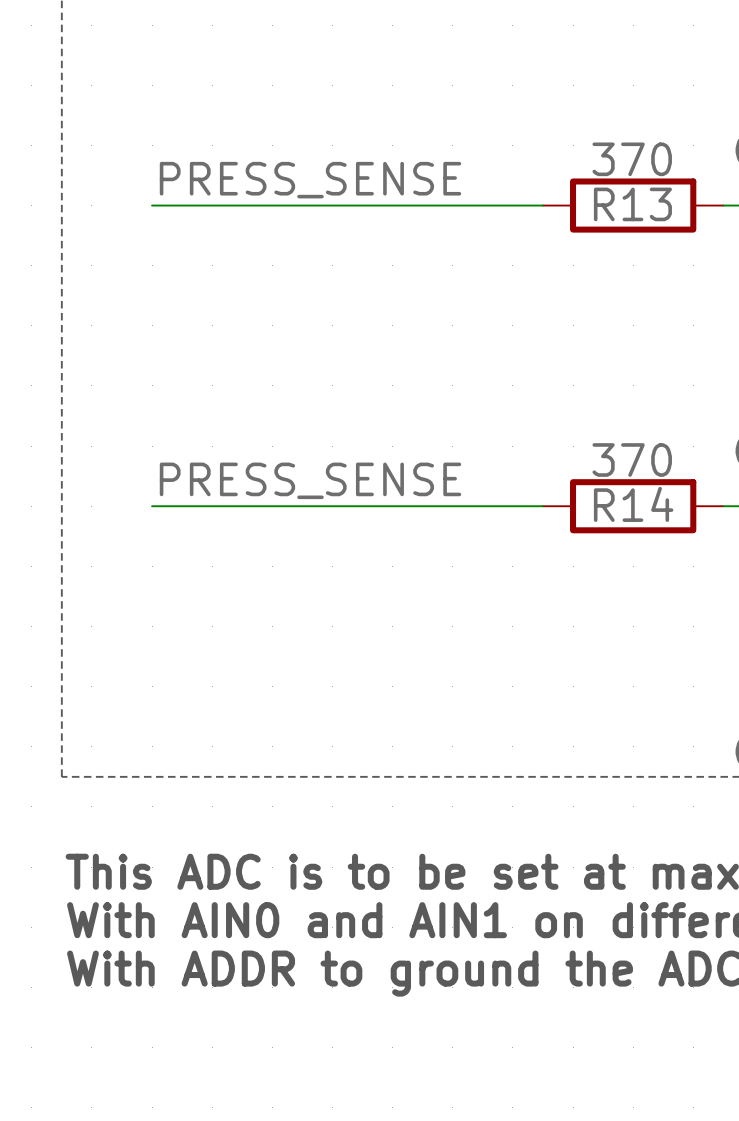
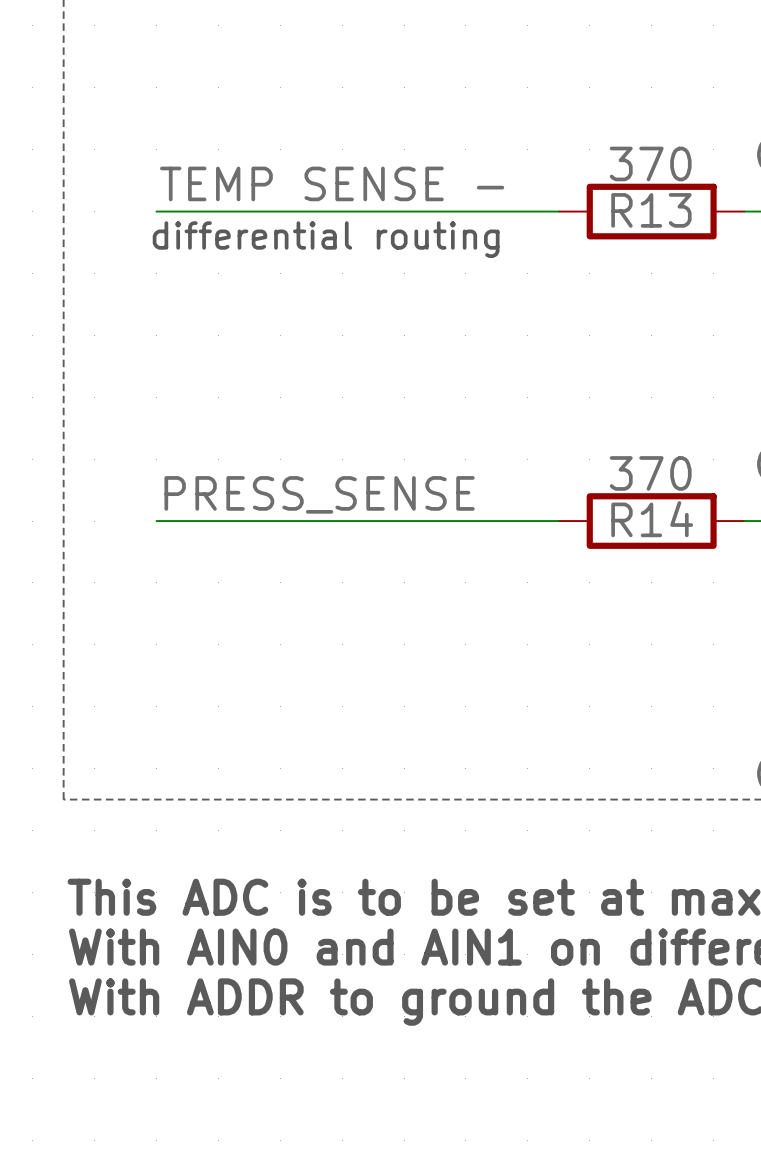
label: PRESS_SENSE (310, 180) -> TEMP SENSE - (332, 183)
text: none -> differential routing (326, 239)

